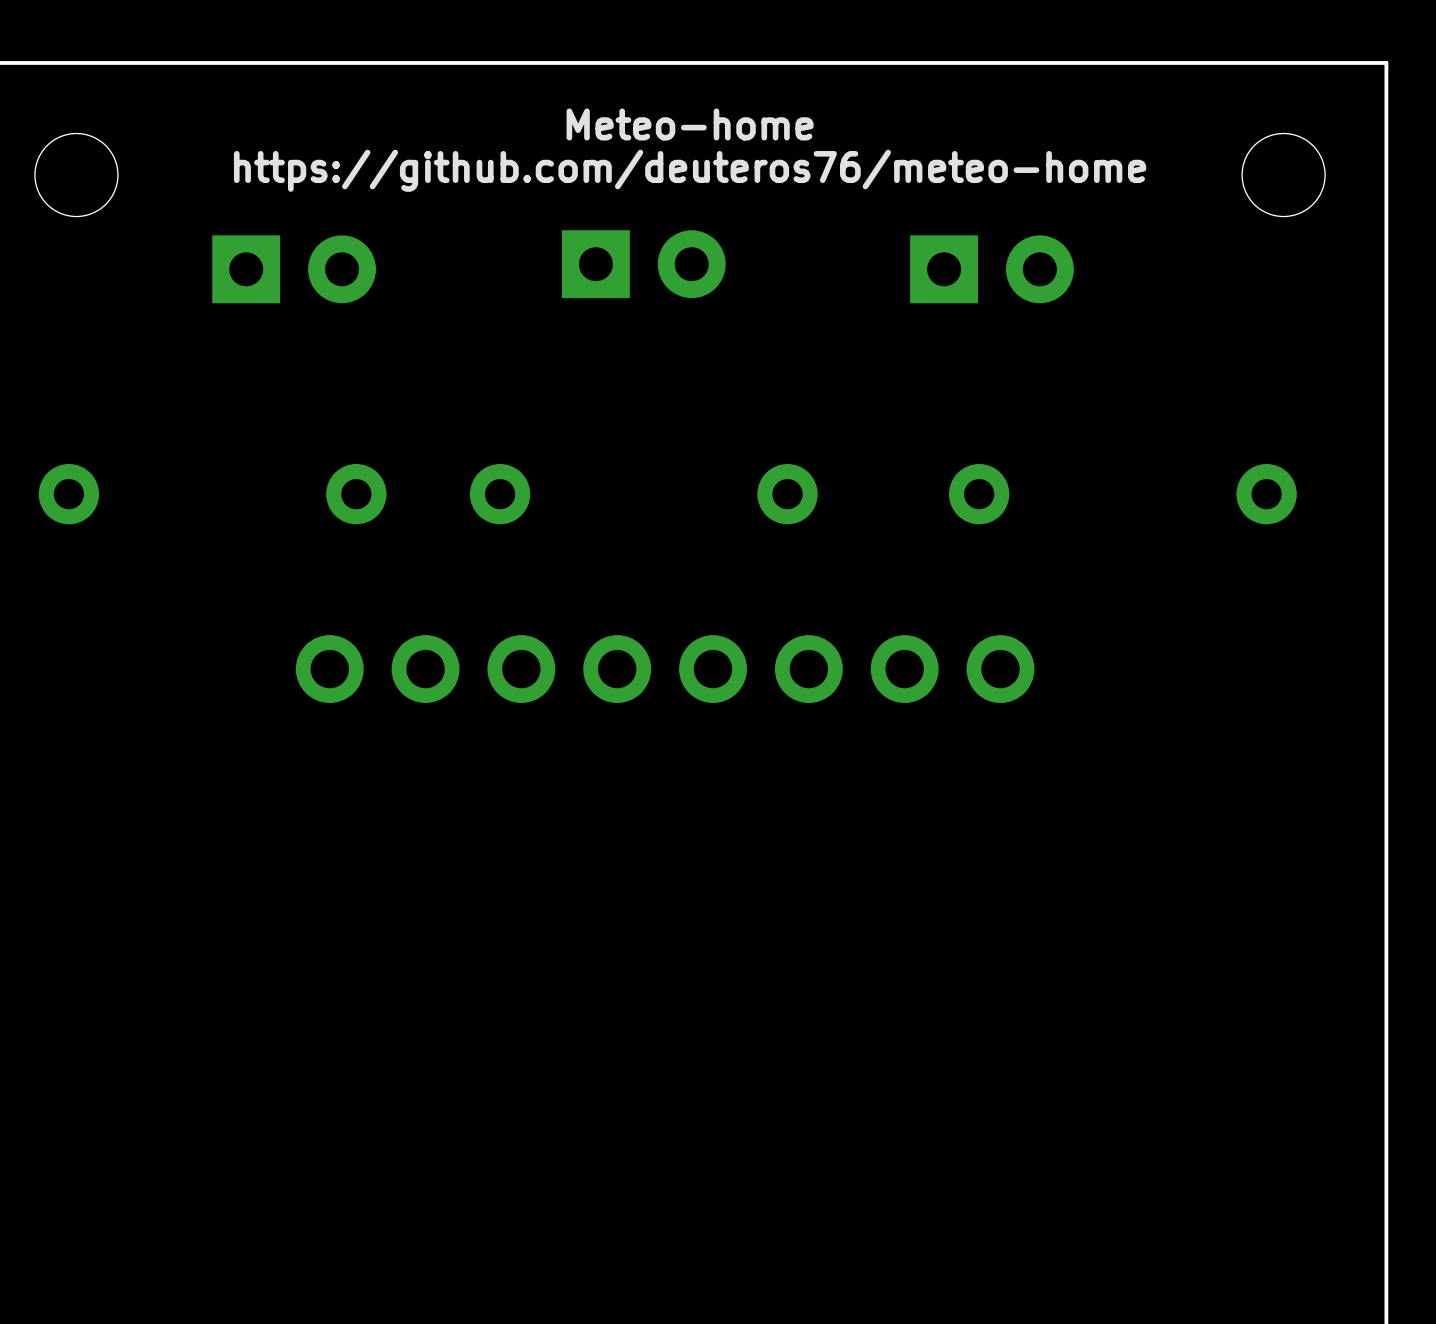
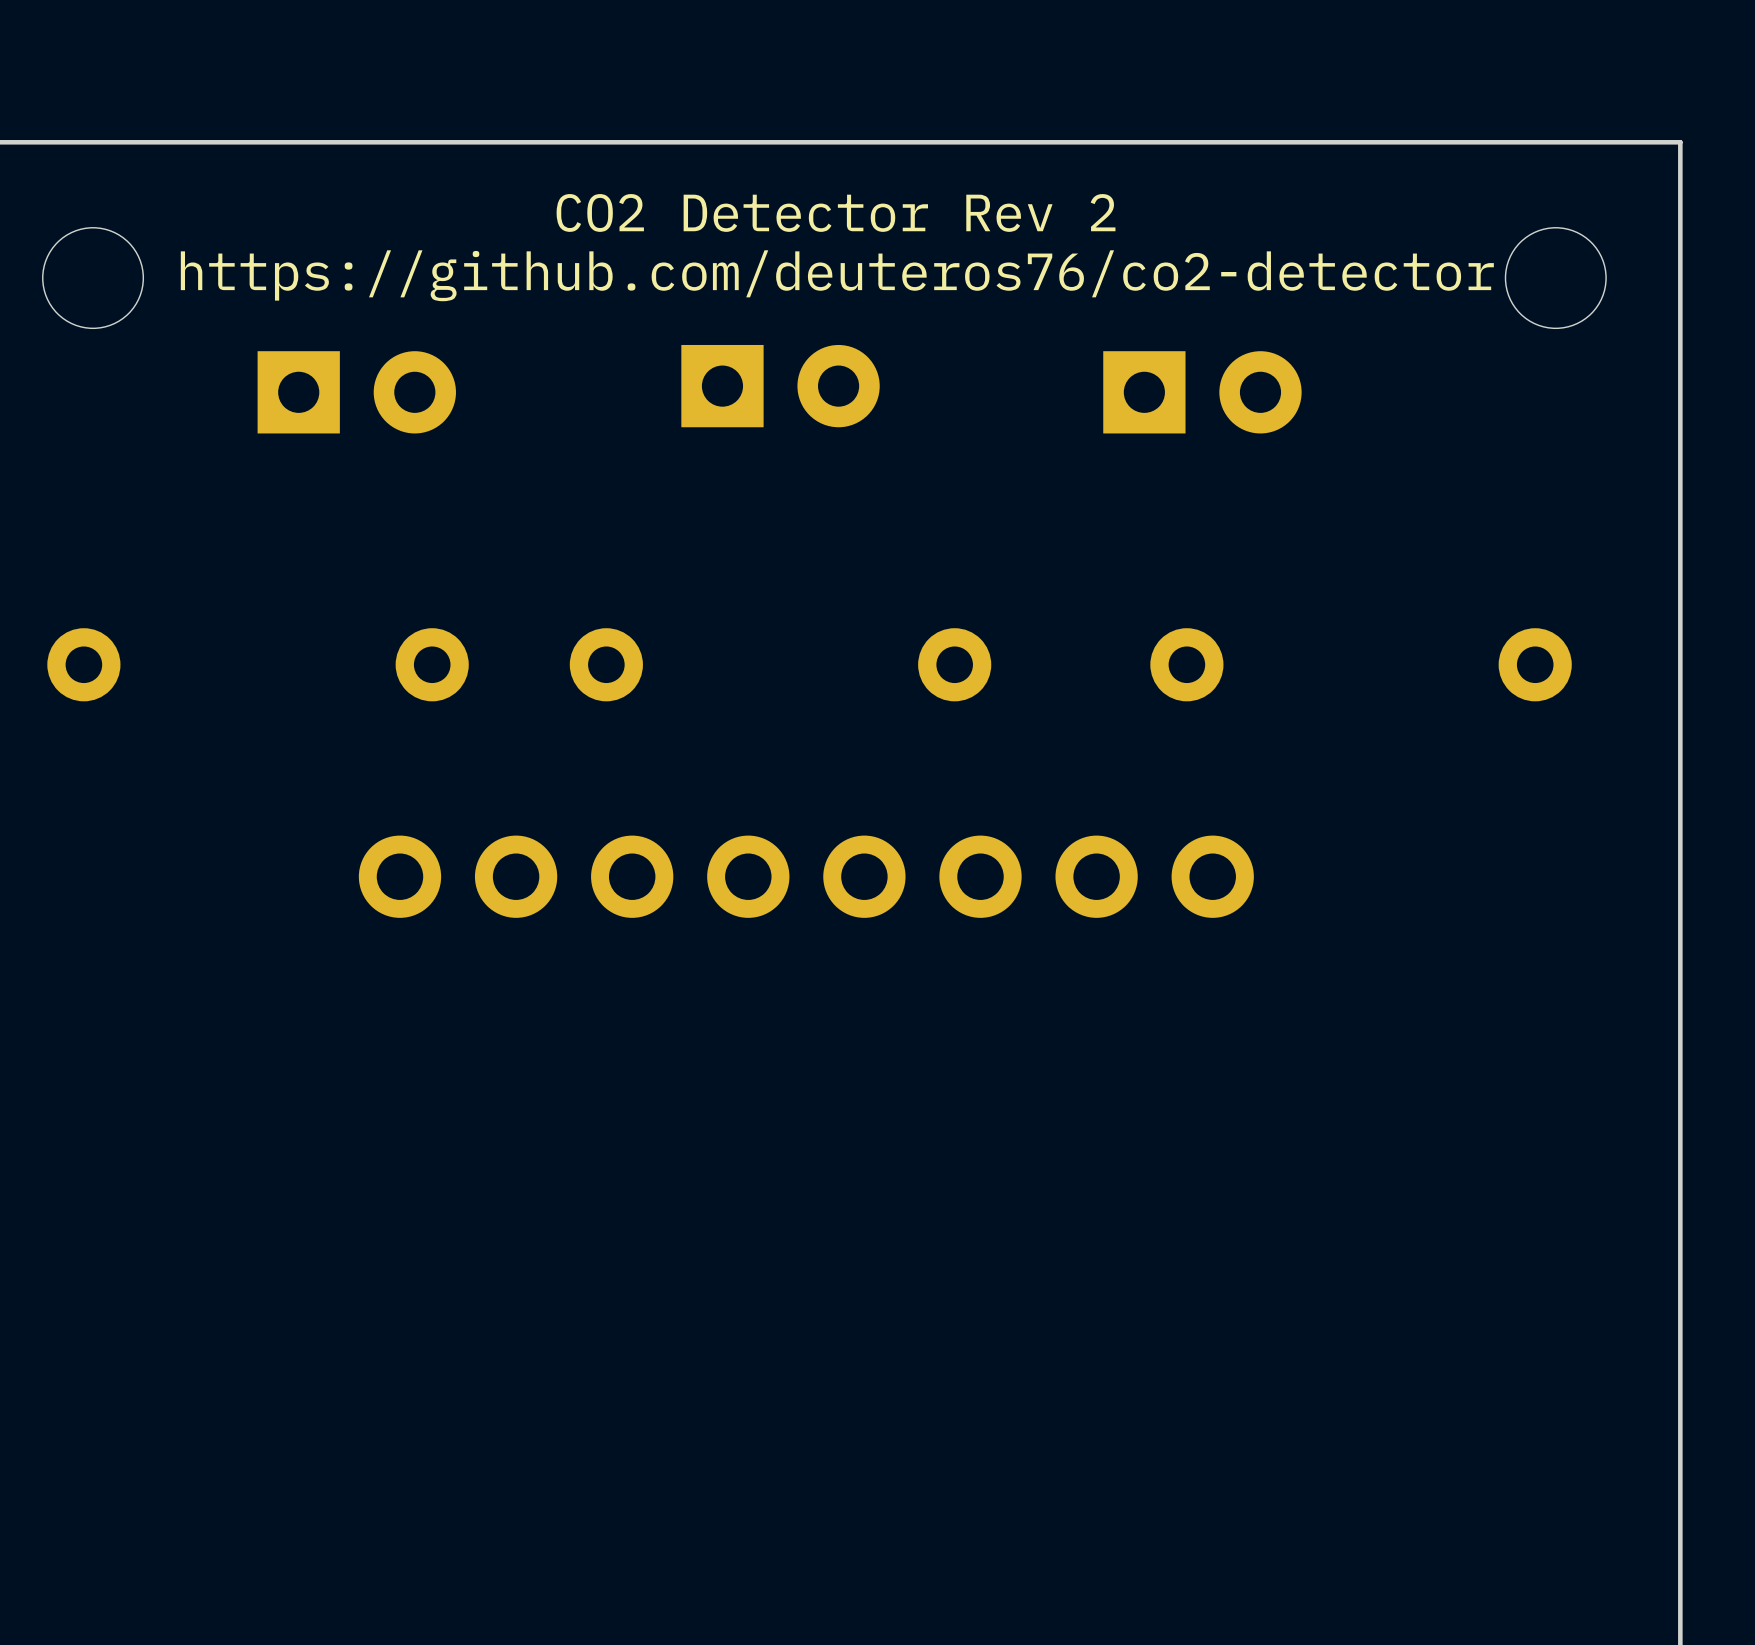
text: Meteo-home (690, 124) -> CO2 Detector Rev 2 (836, 212)
text: https://github.com/deuteros76/meteo-home (690, 170) -> https://github.com/deuteros76/co2-detector (837, 275)

